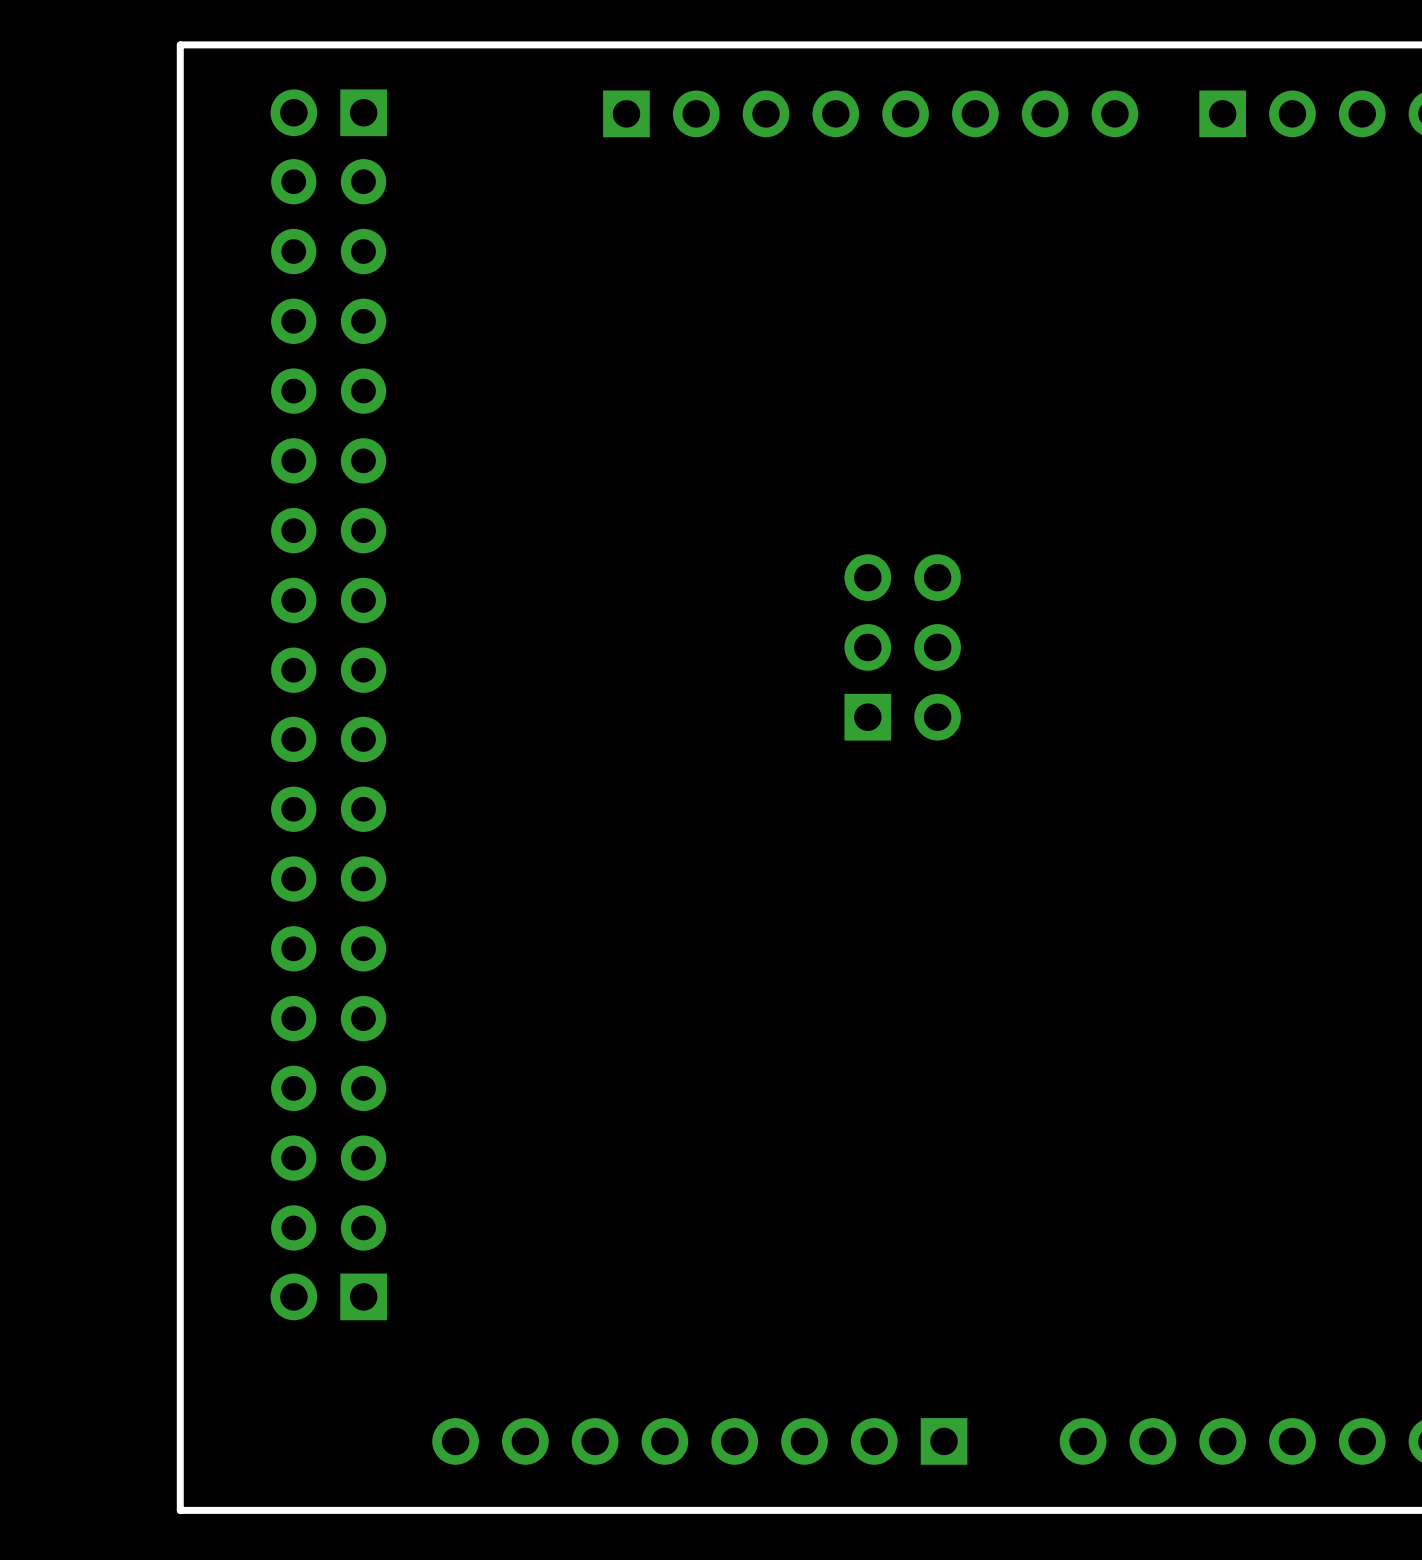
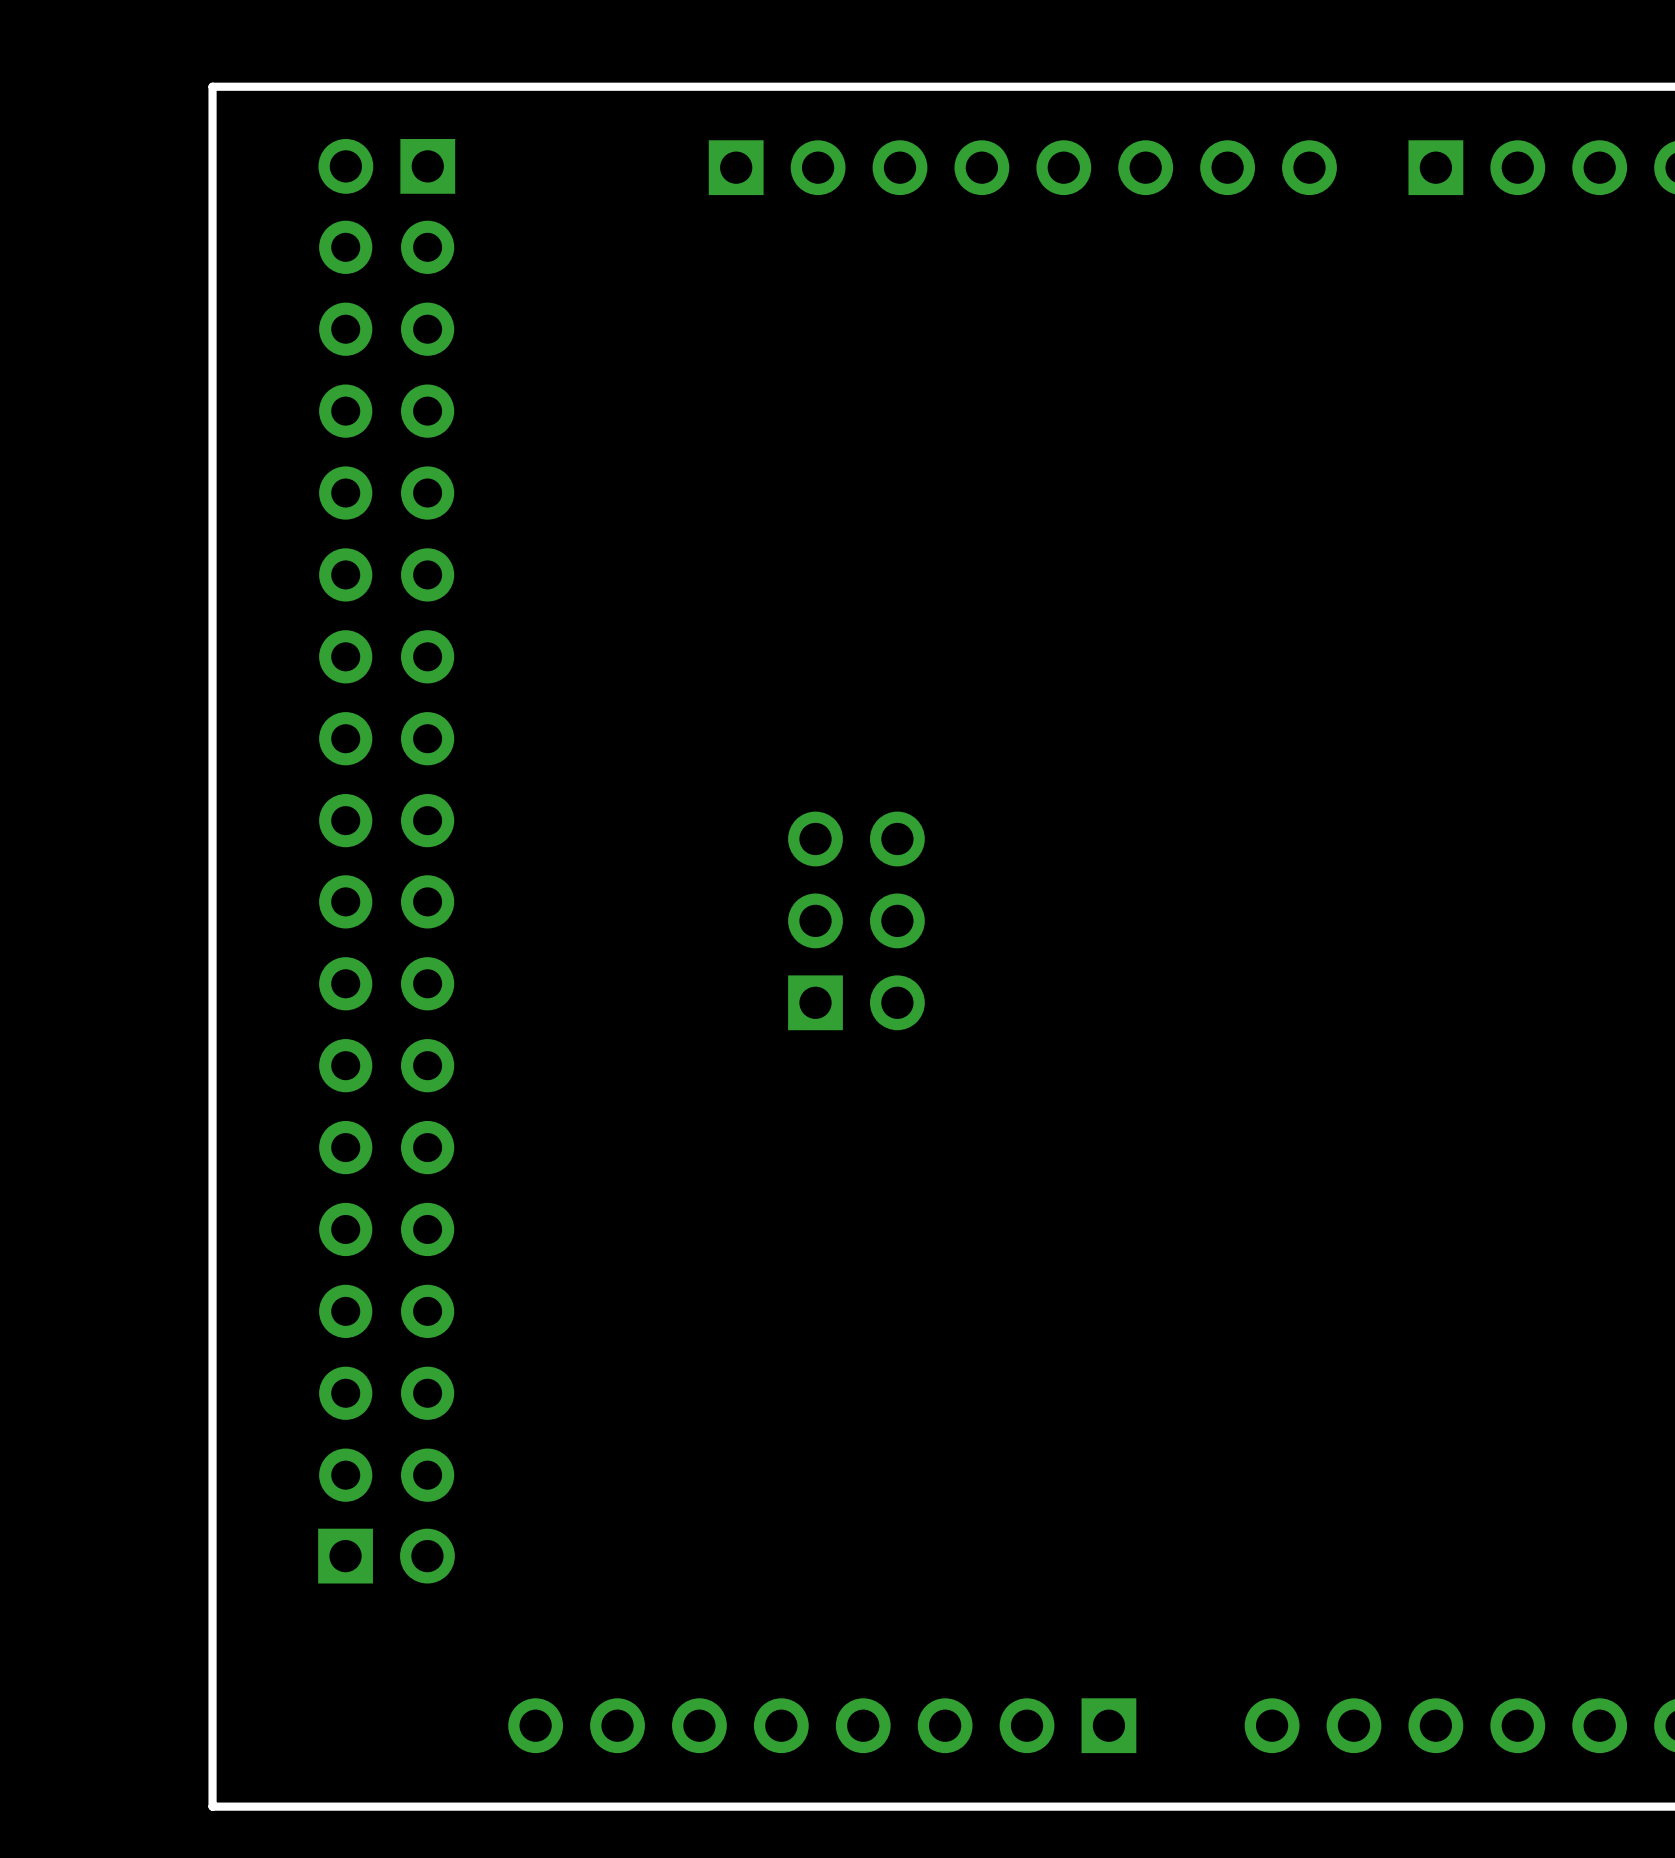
part position: (902, 647) -> (856, 920)
part rotation: 0° (328, 1296) -> 180° (386, 1556)

